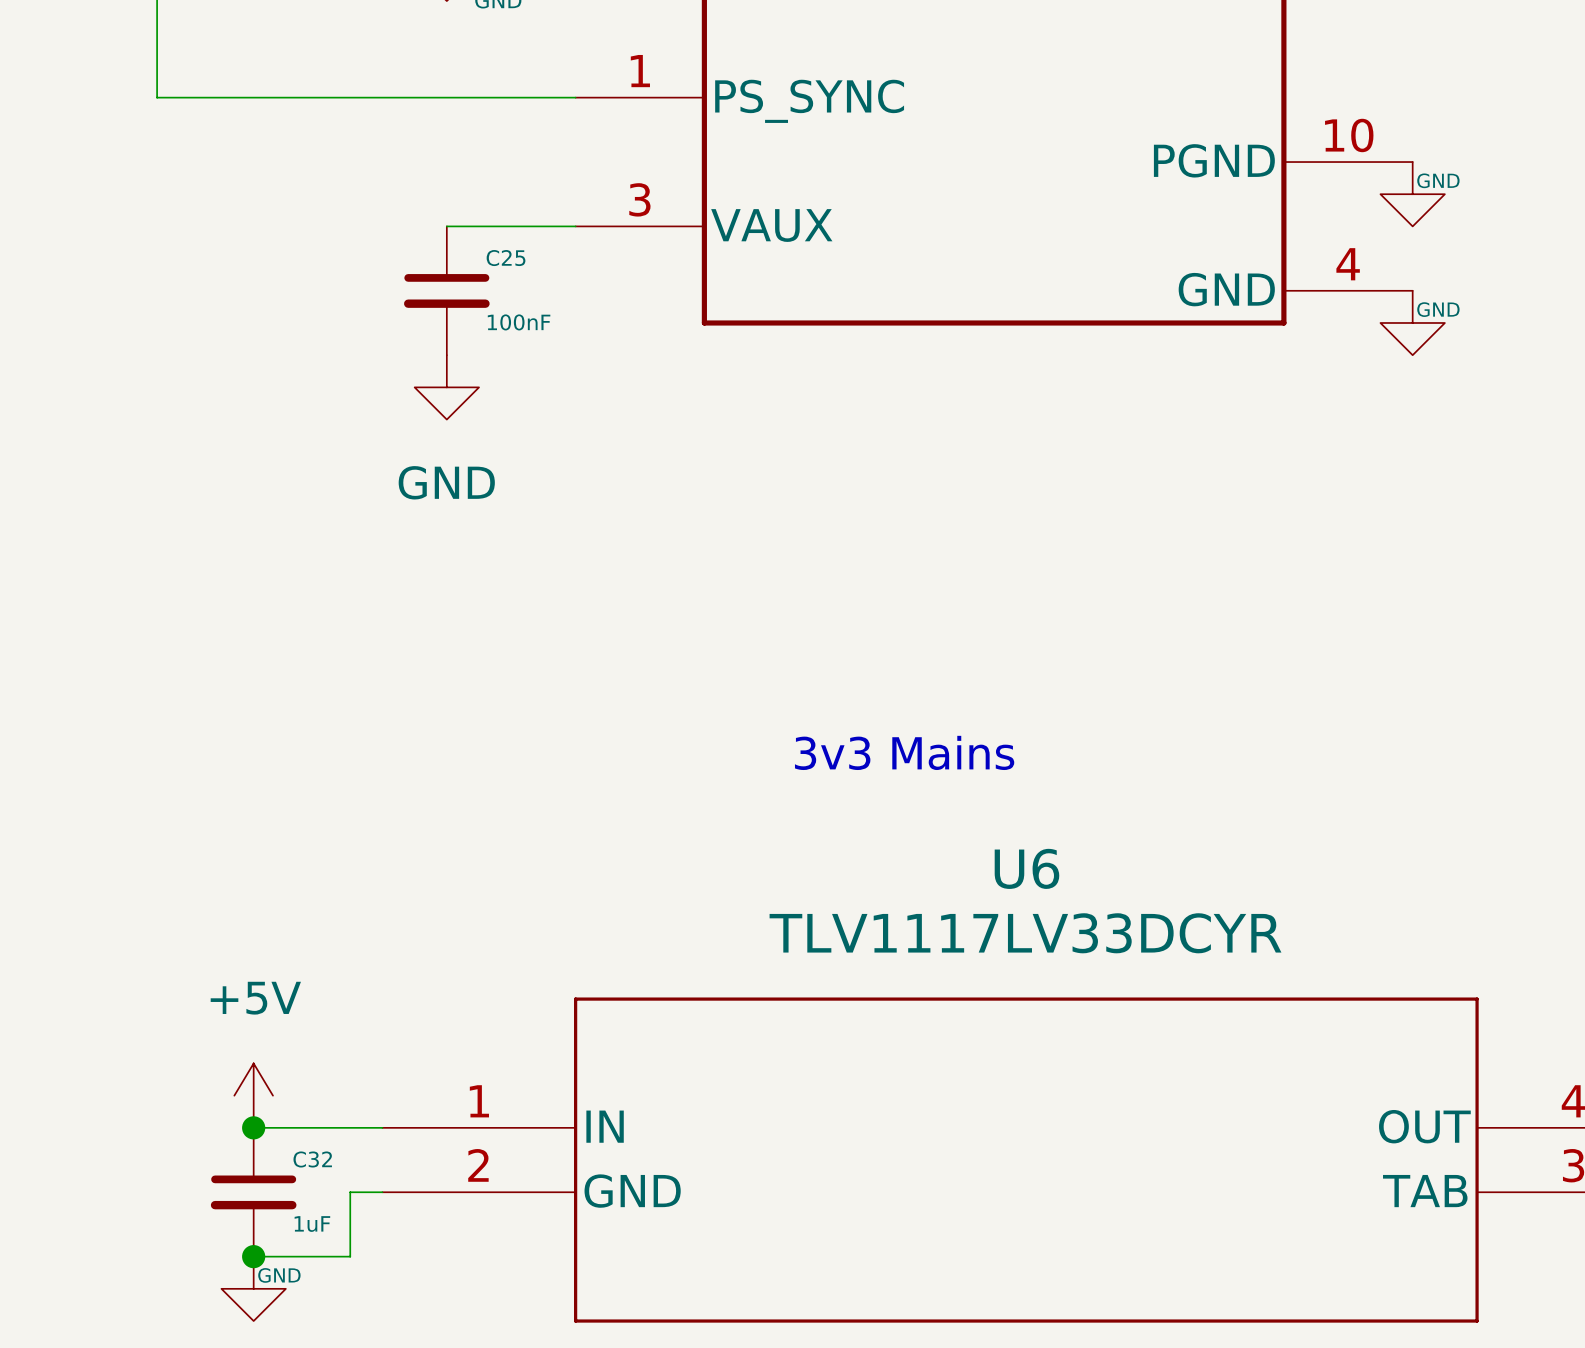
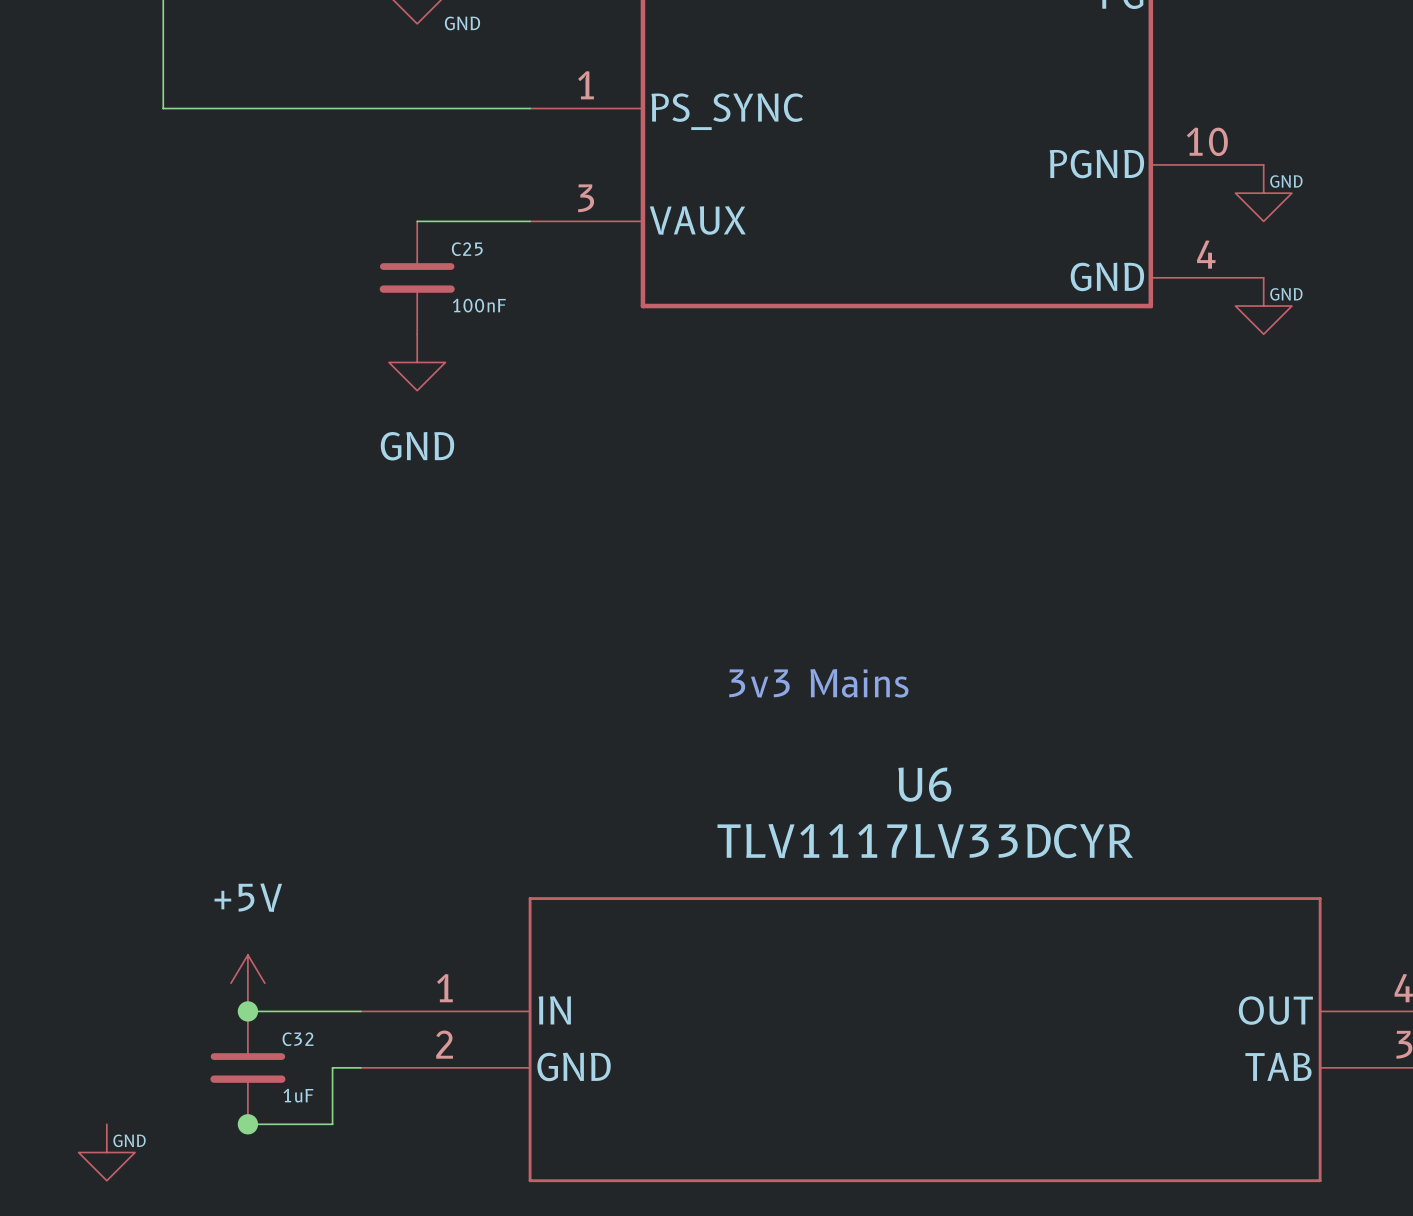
power symbol position: GND (253, 1288) -> GND (106, 1152)

